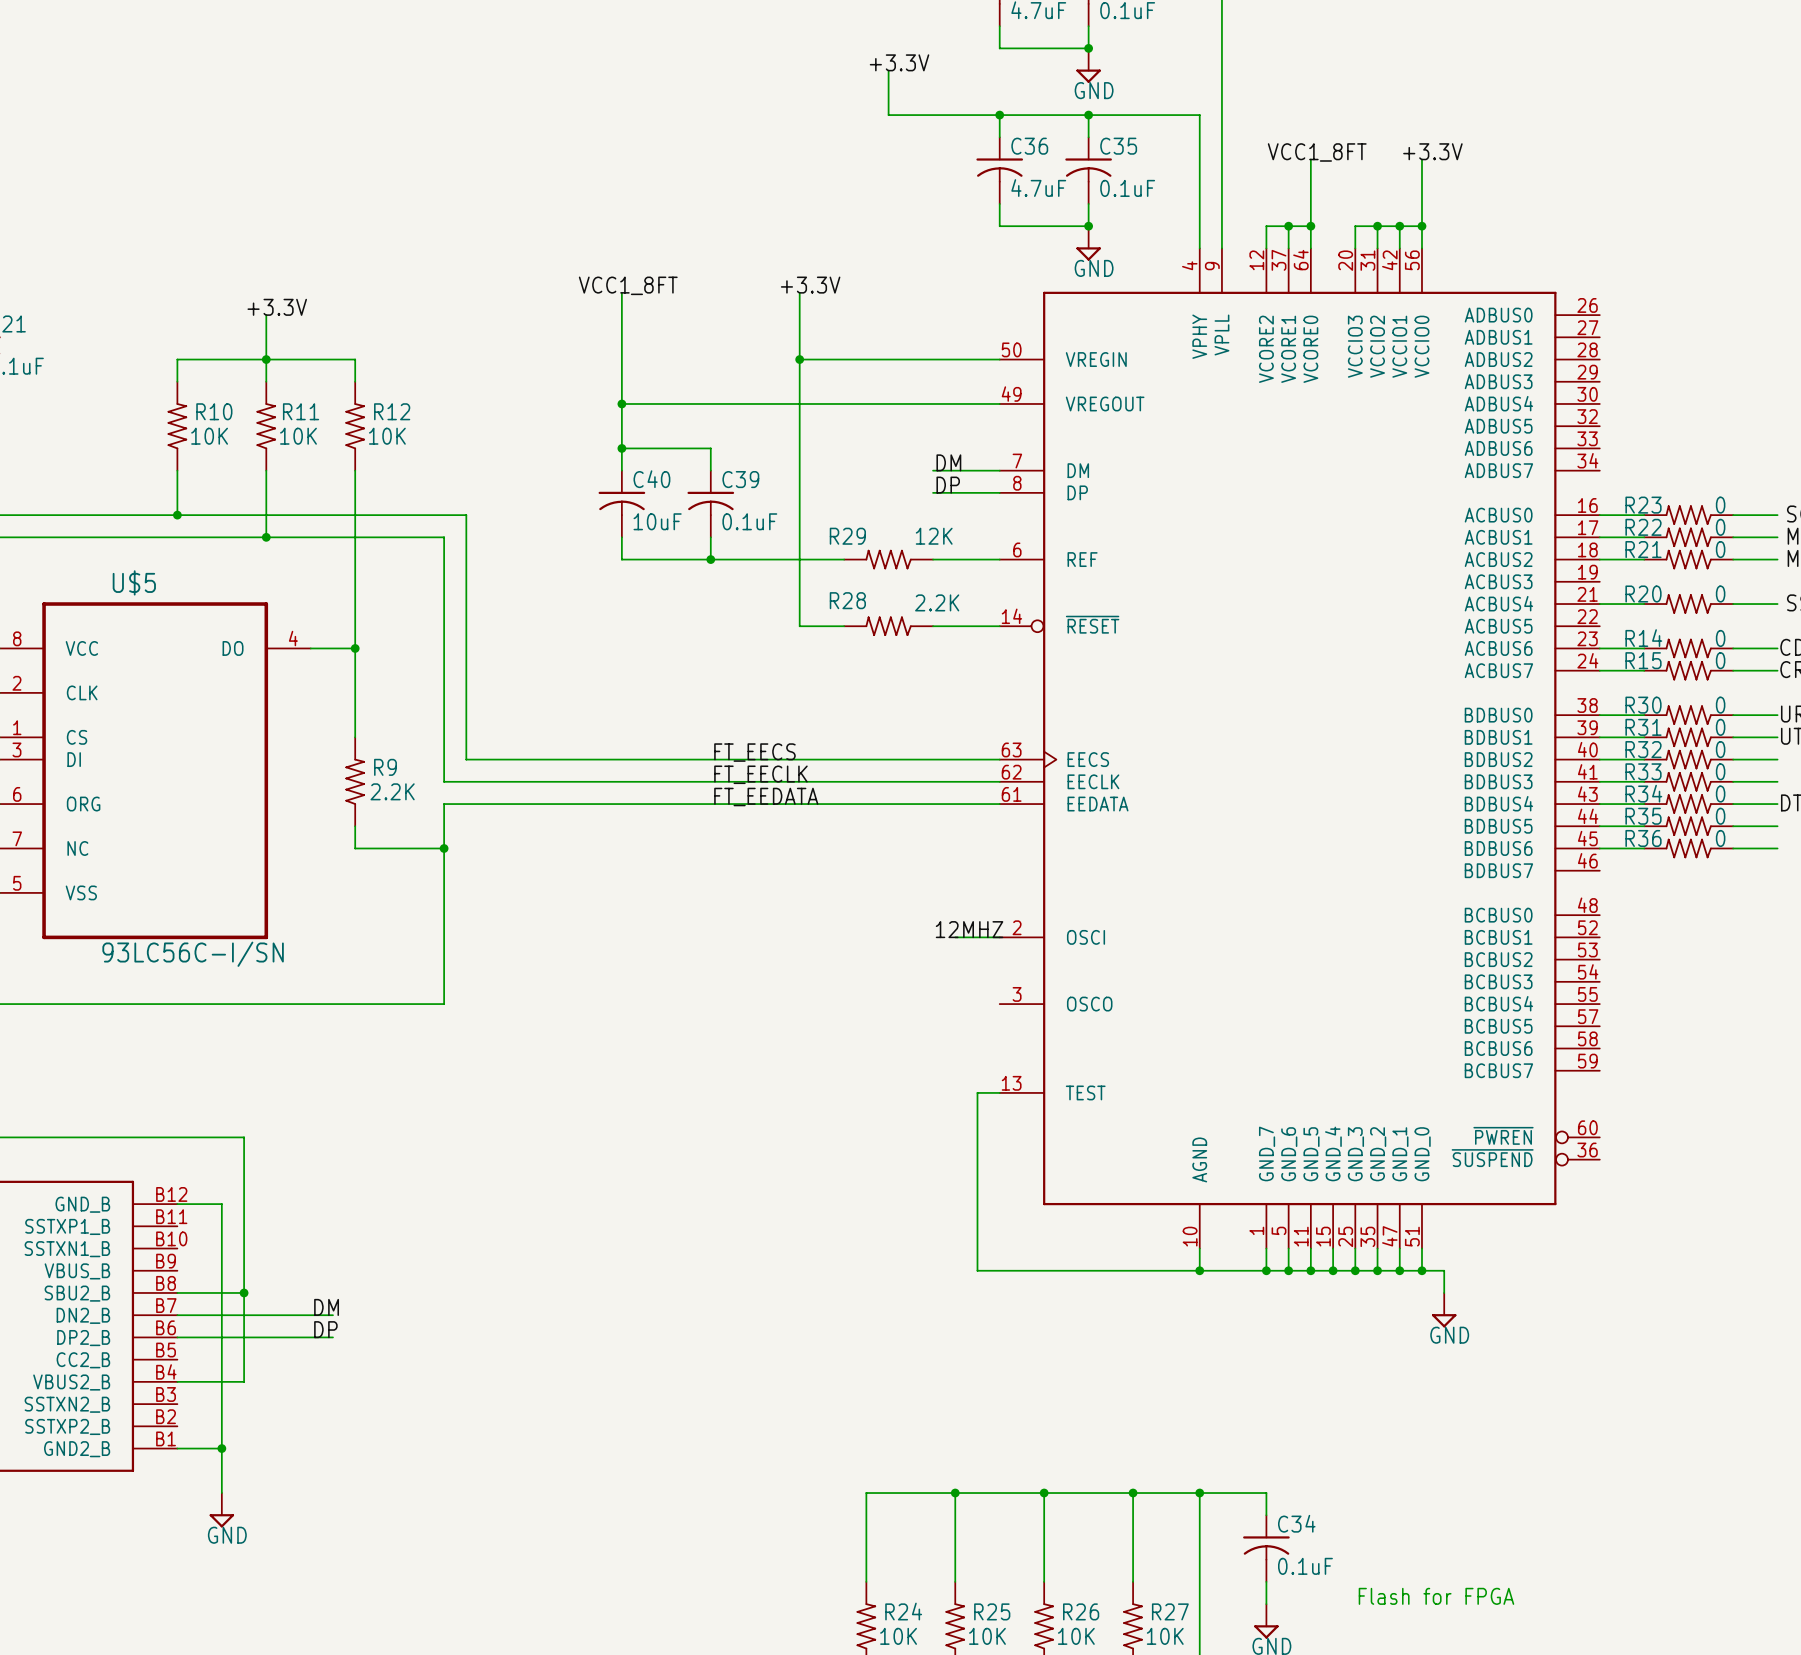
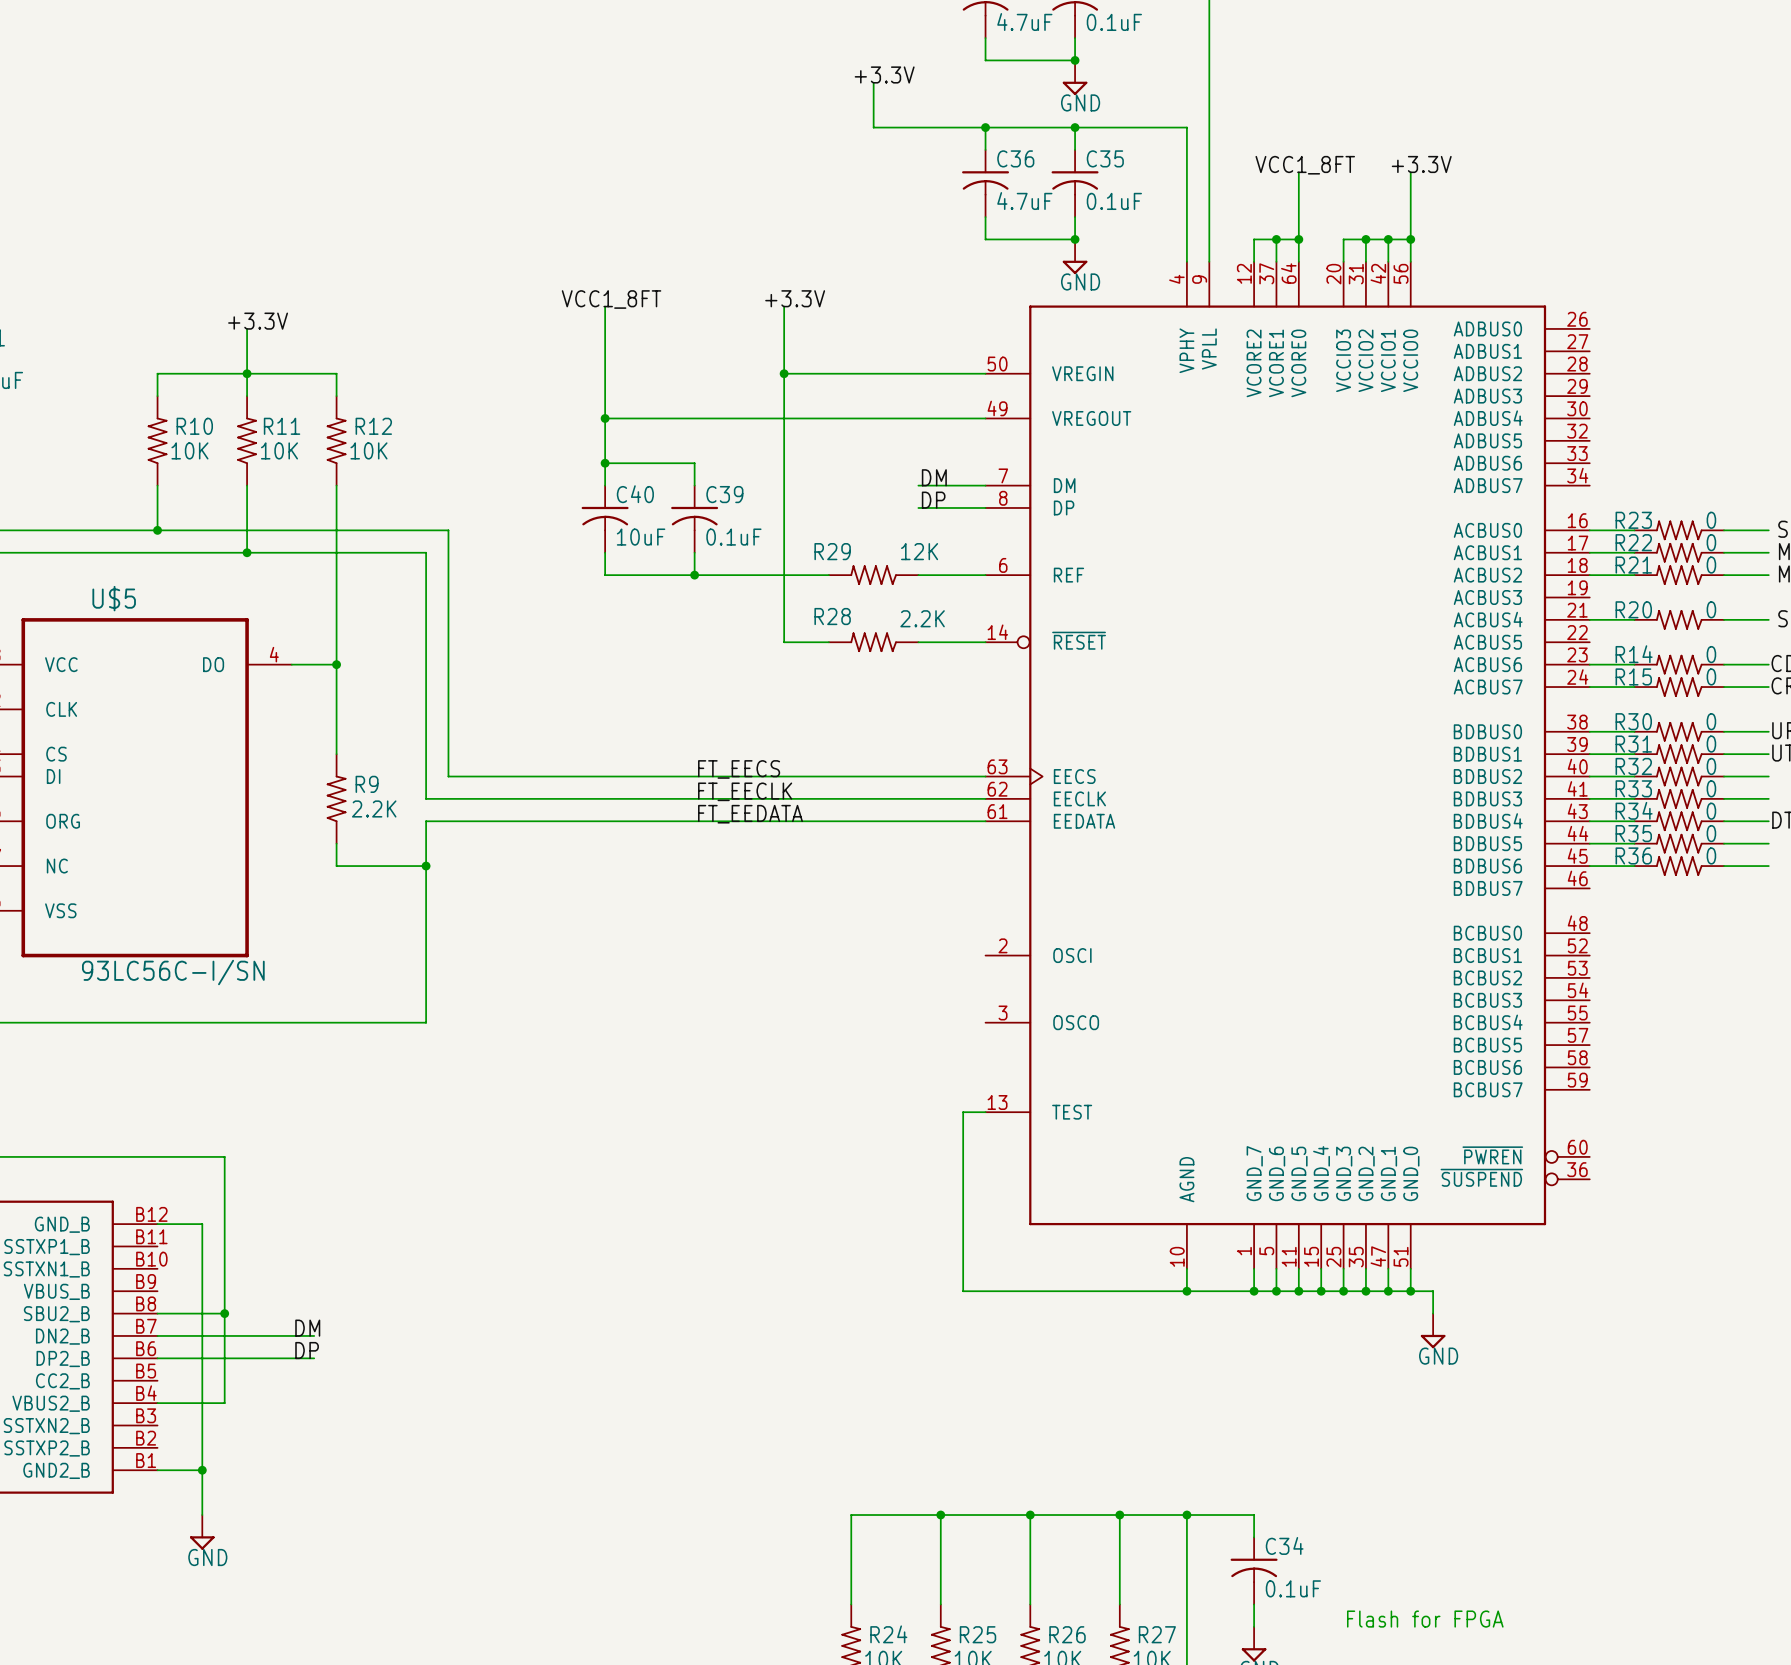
label: 12MHZ (969, 929) -> none
wire: (955, 937) (999, 937) -> none

